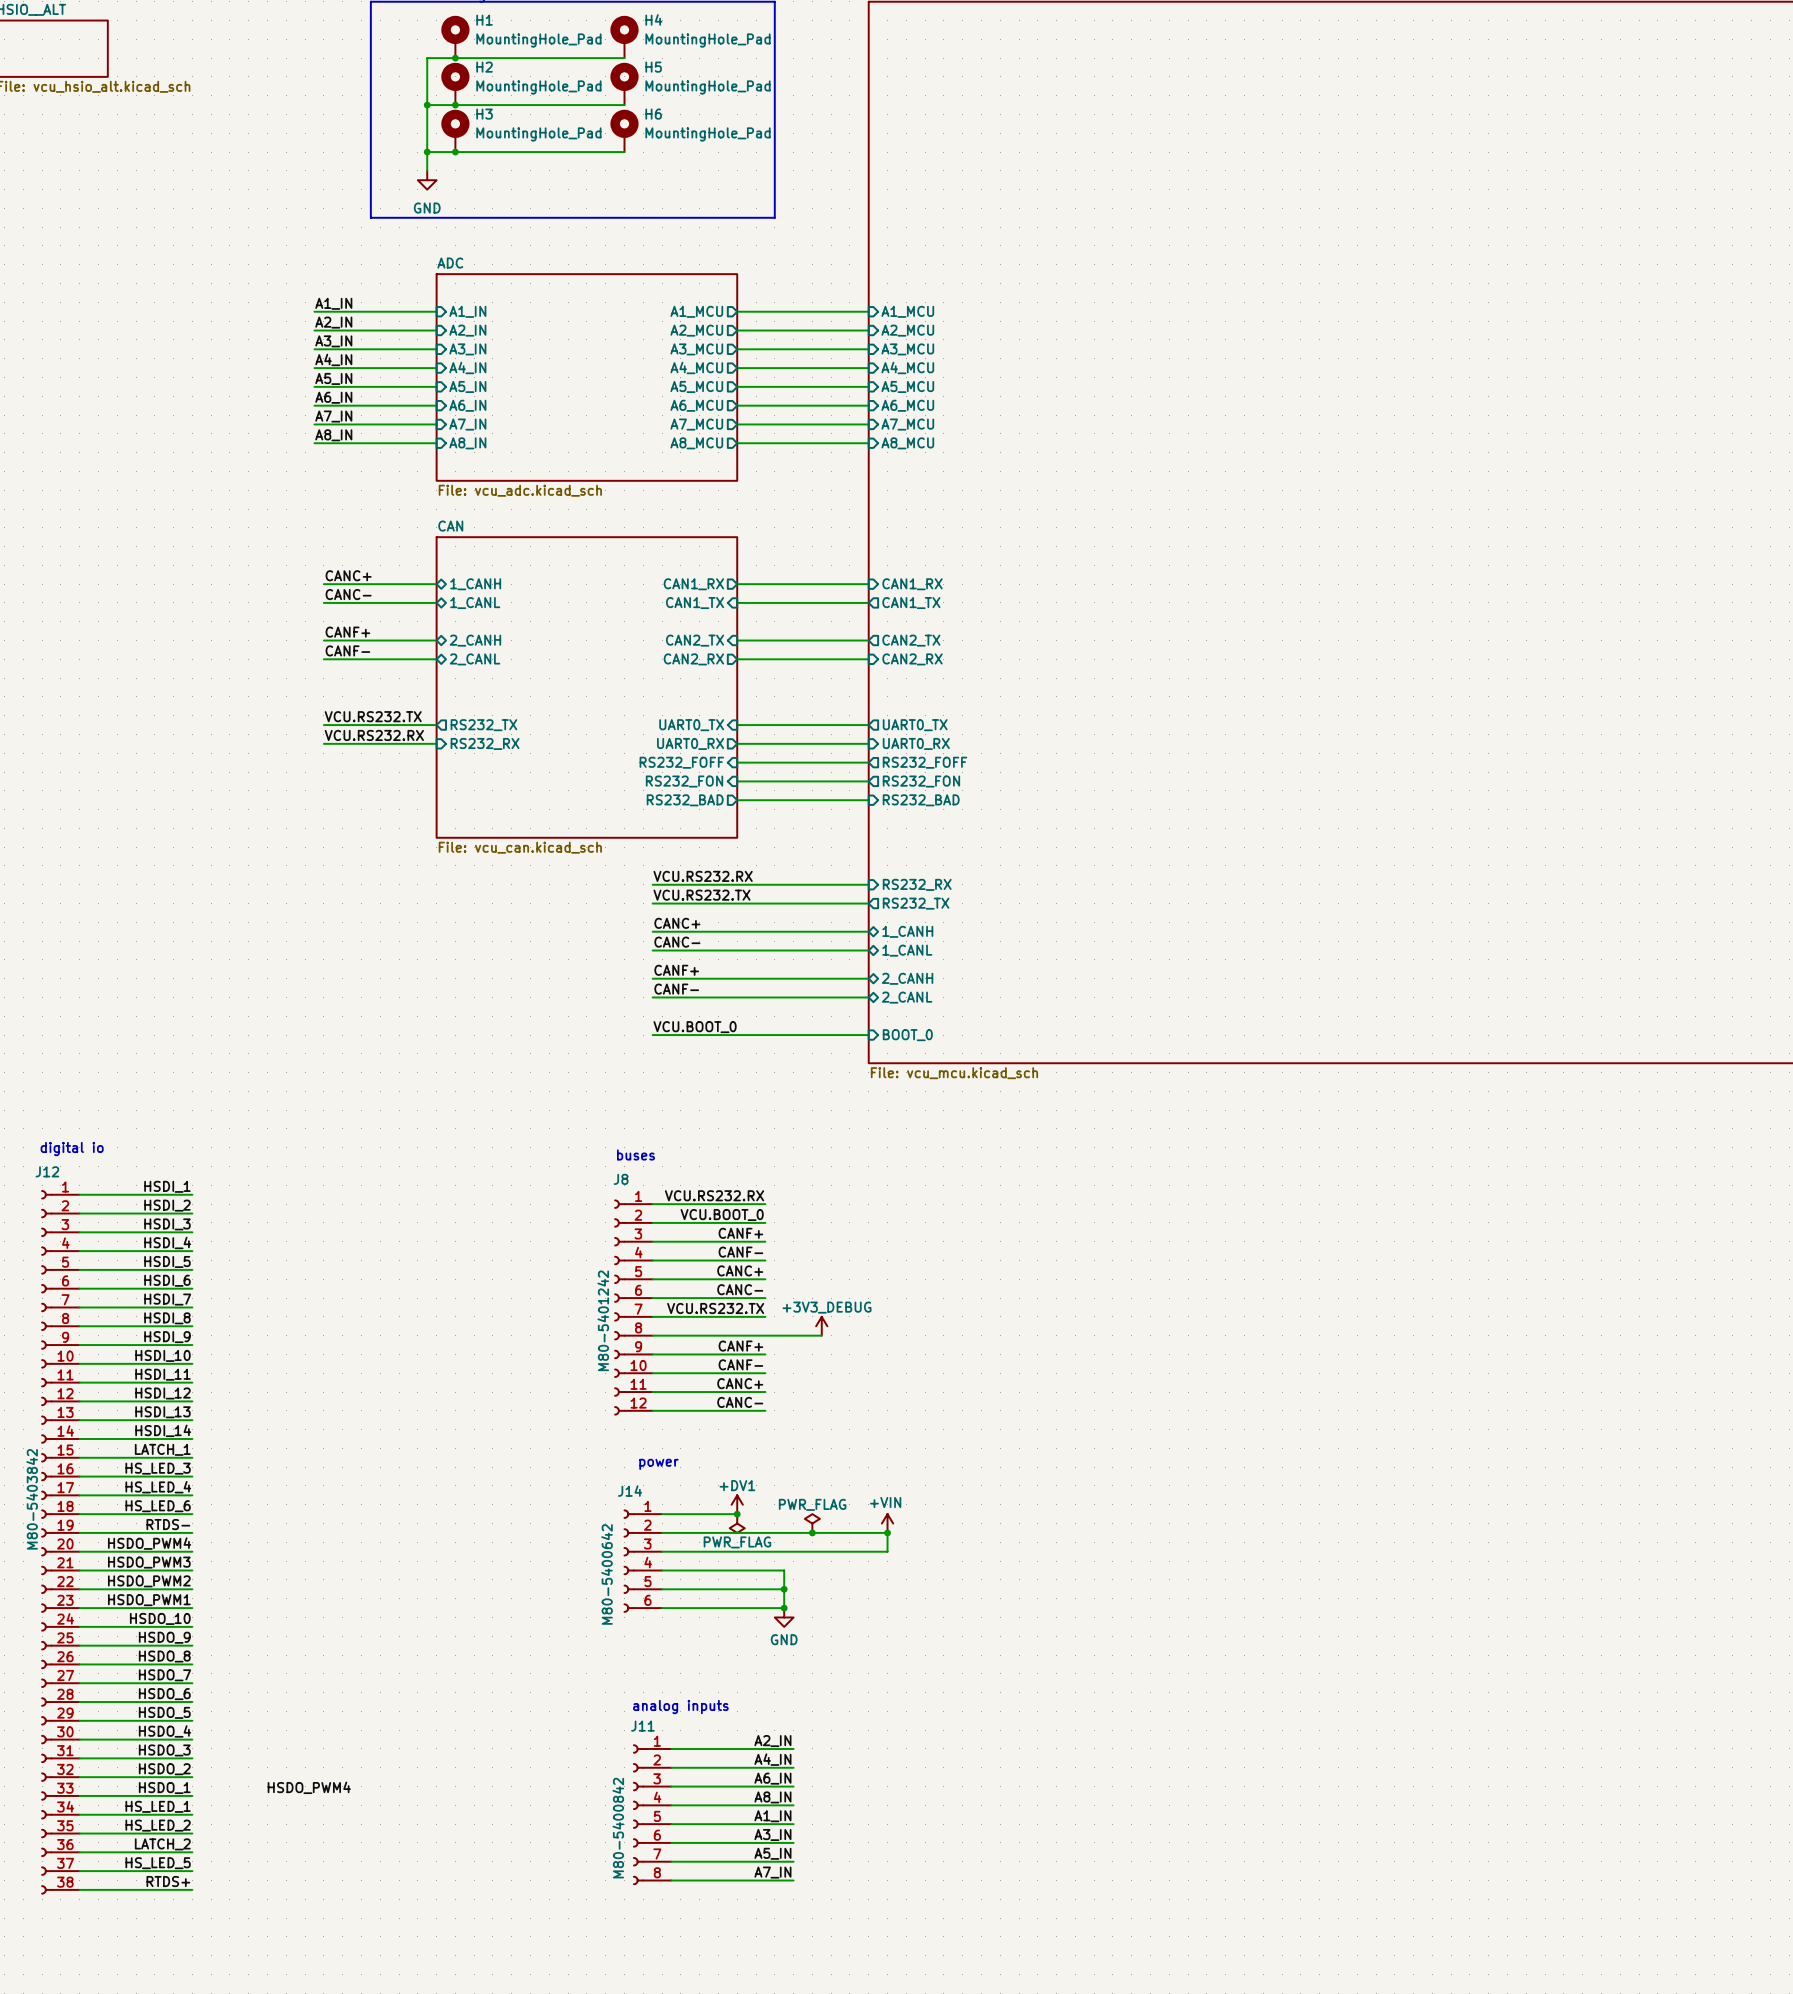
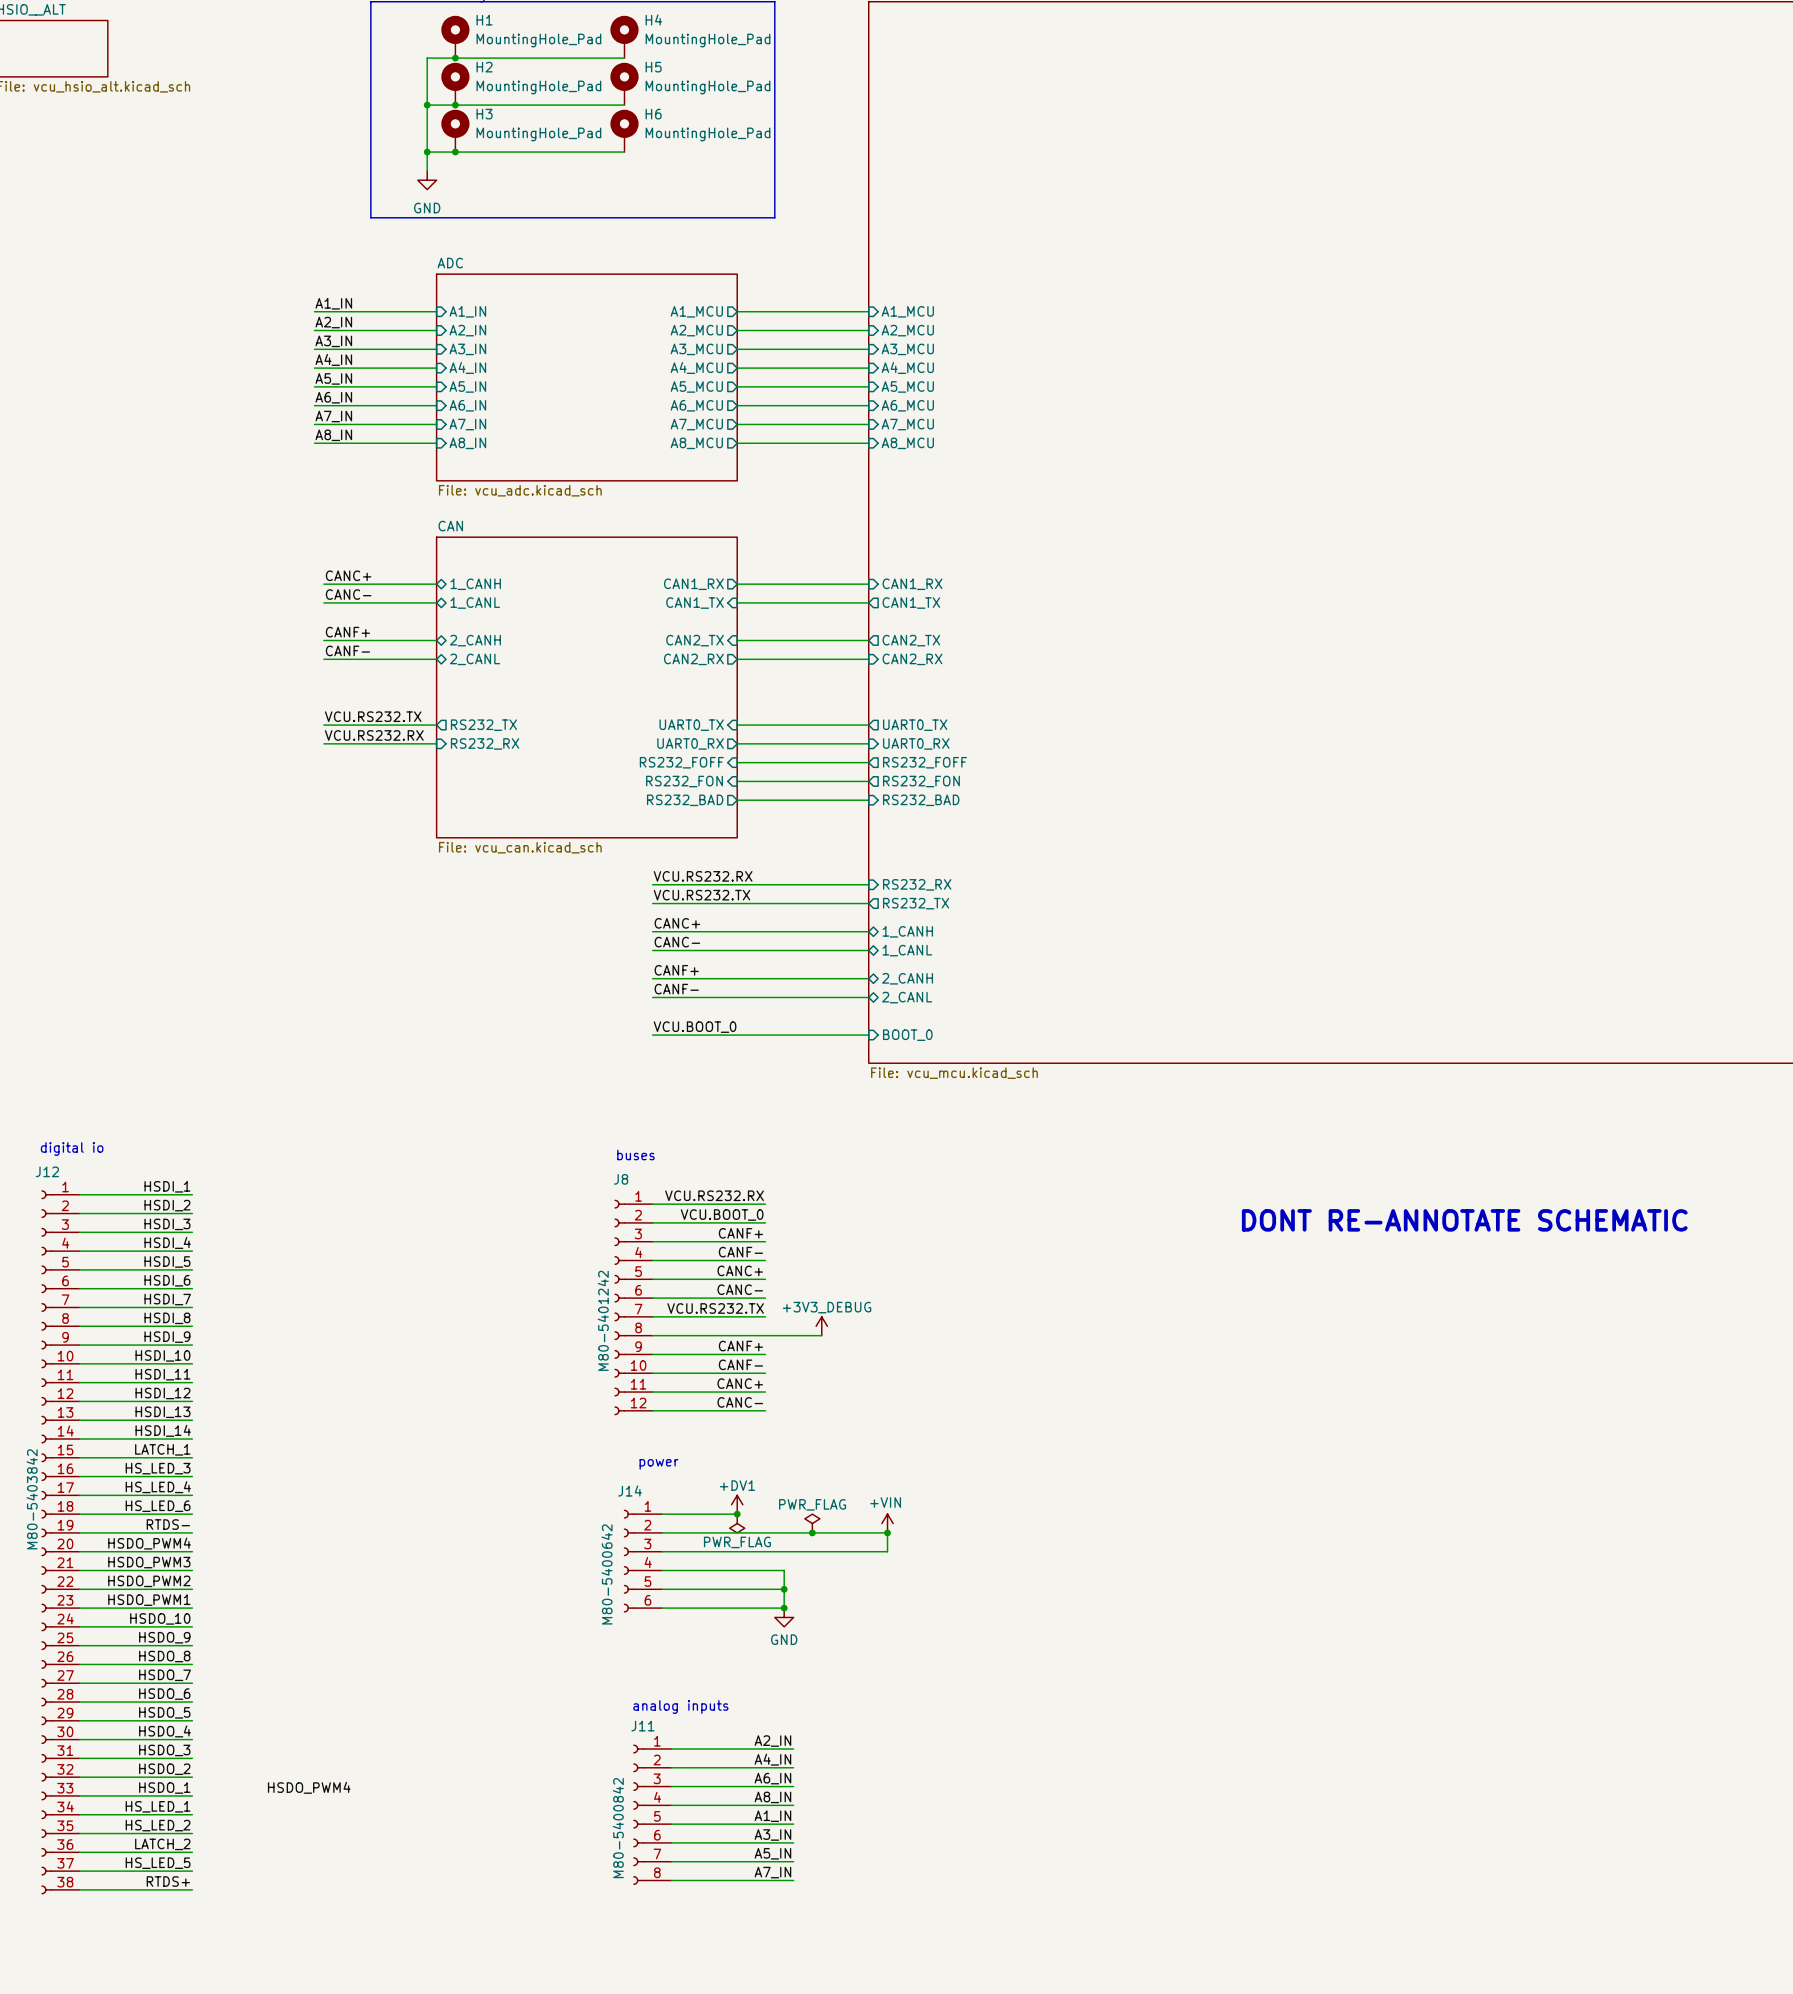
text: none -> DONT RE-ANNOTATE SCHEMATIC (1464, 1220)

